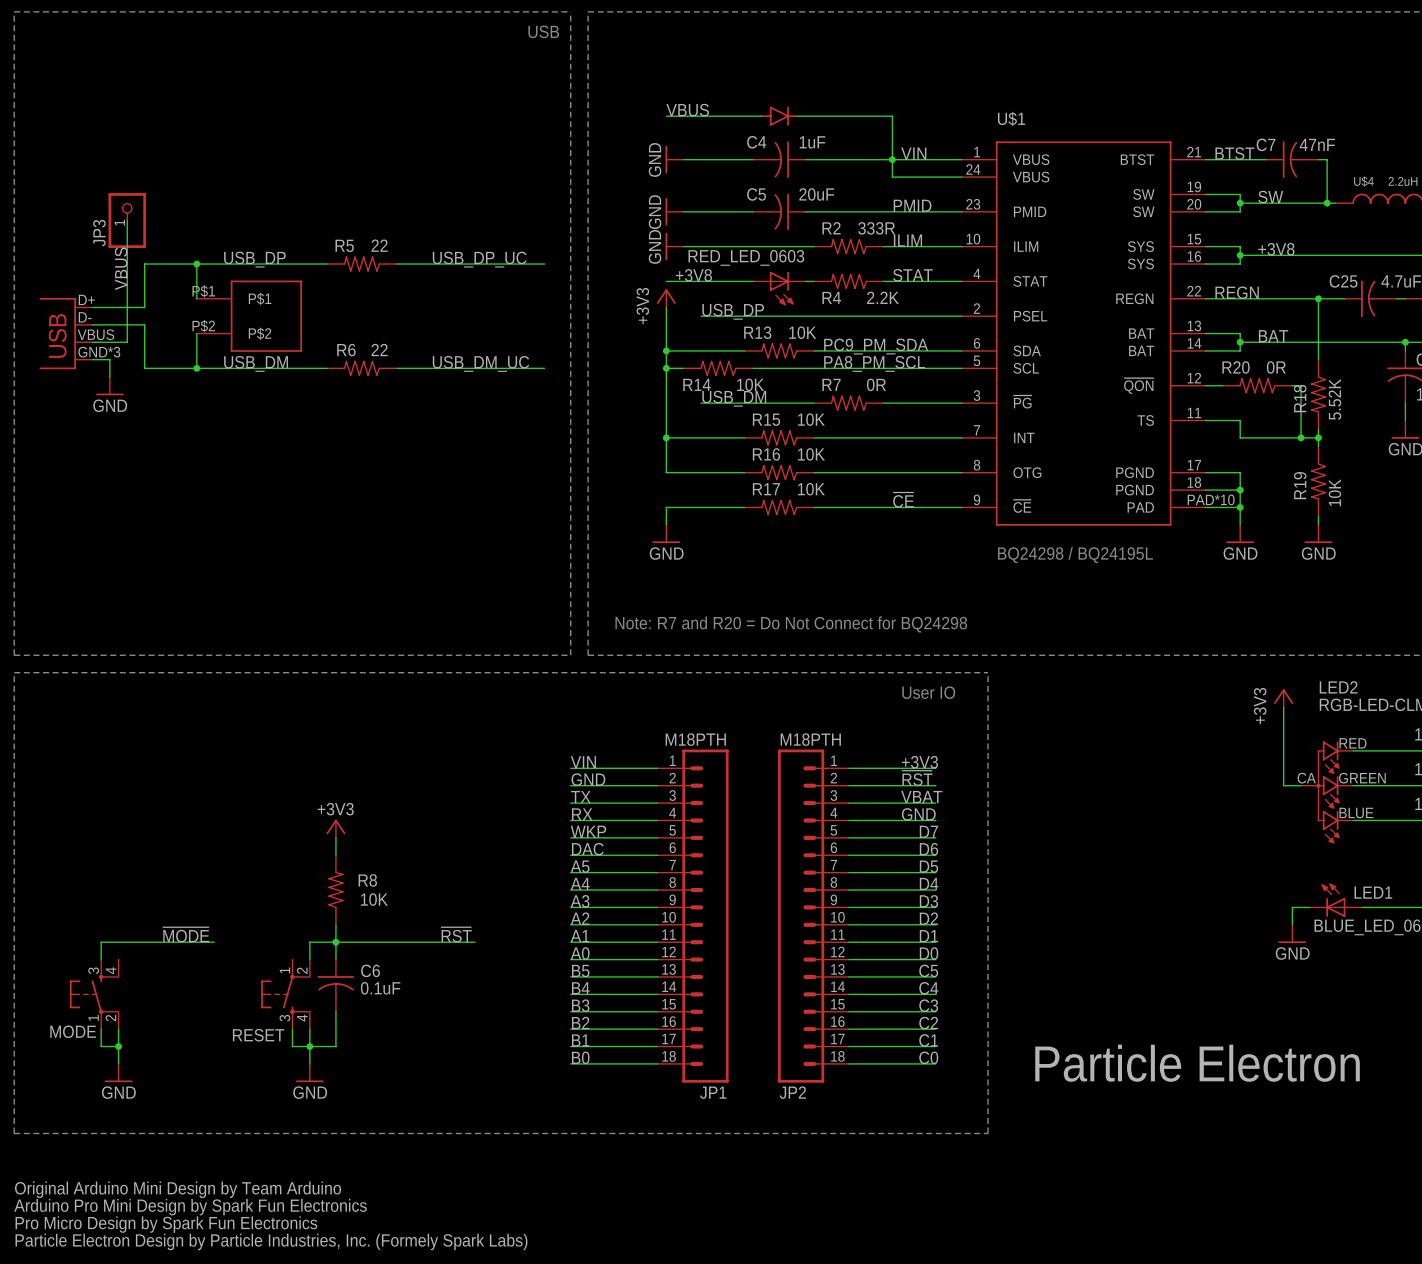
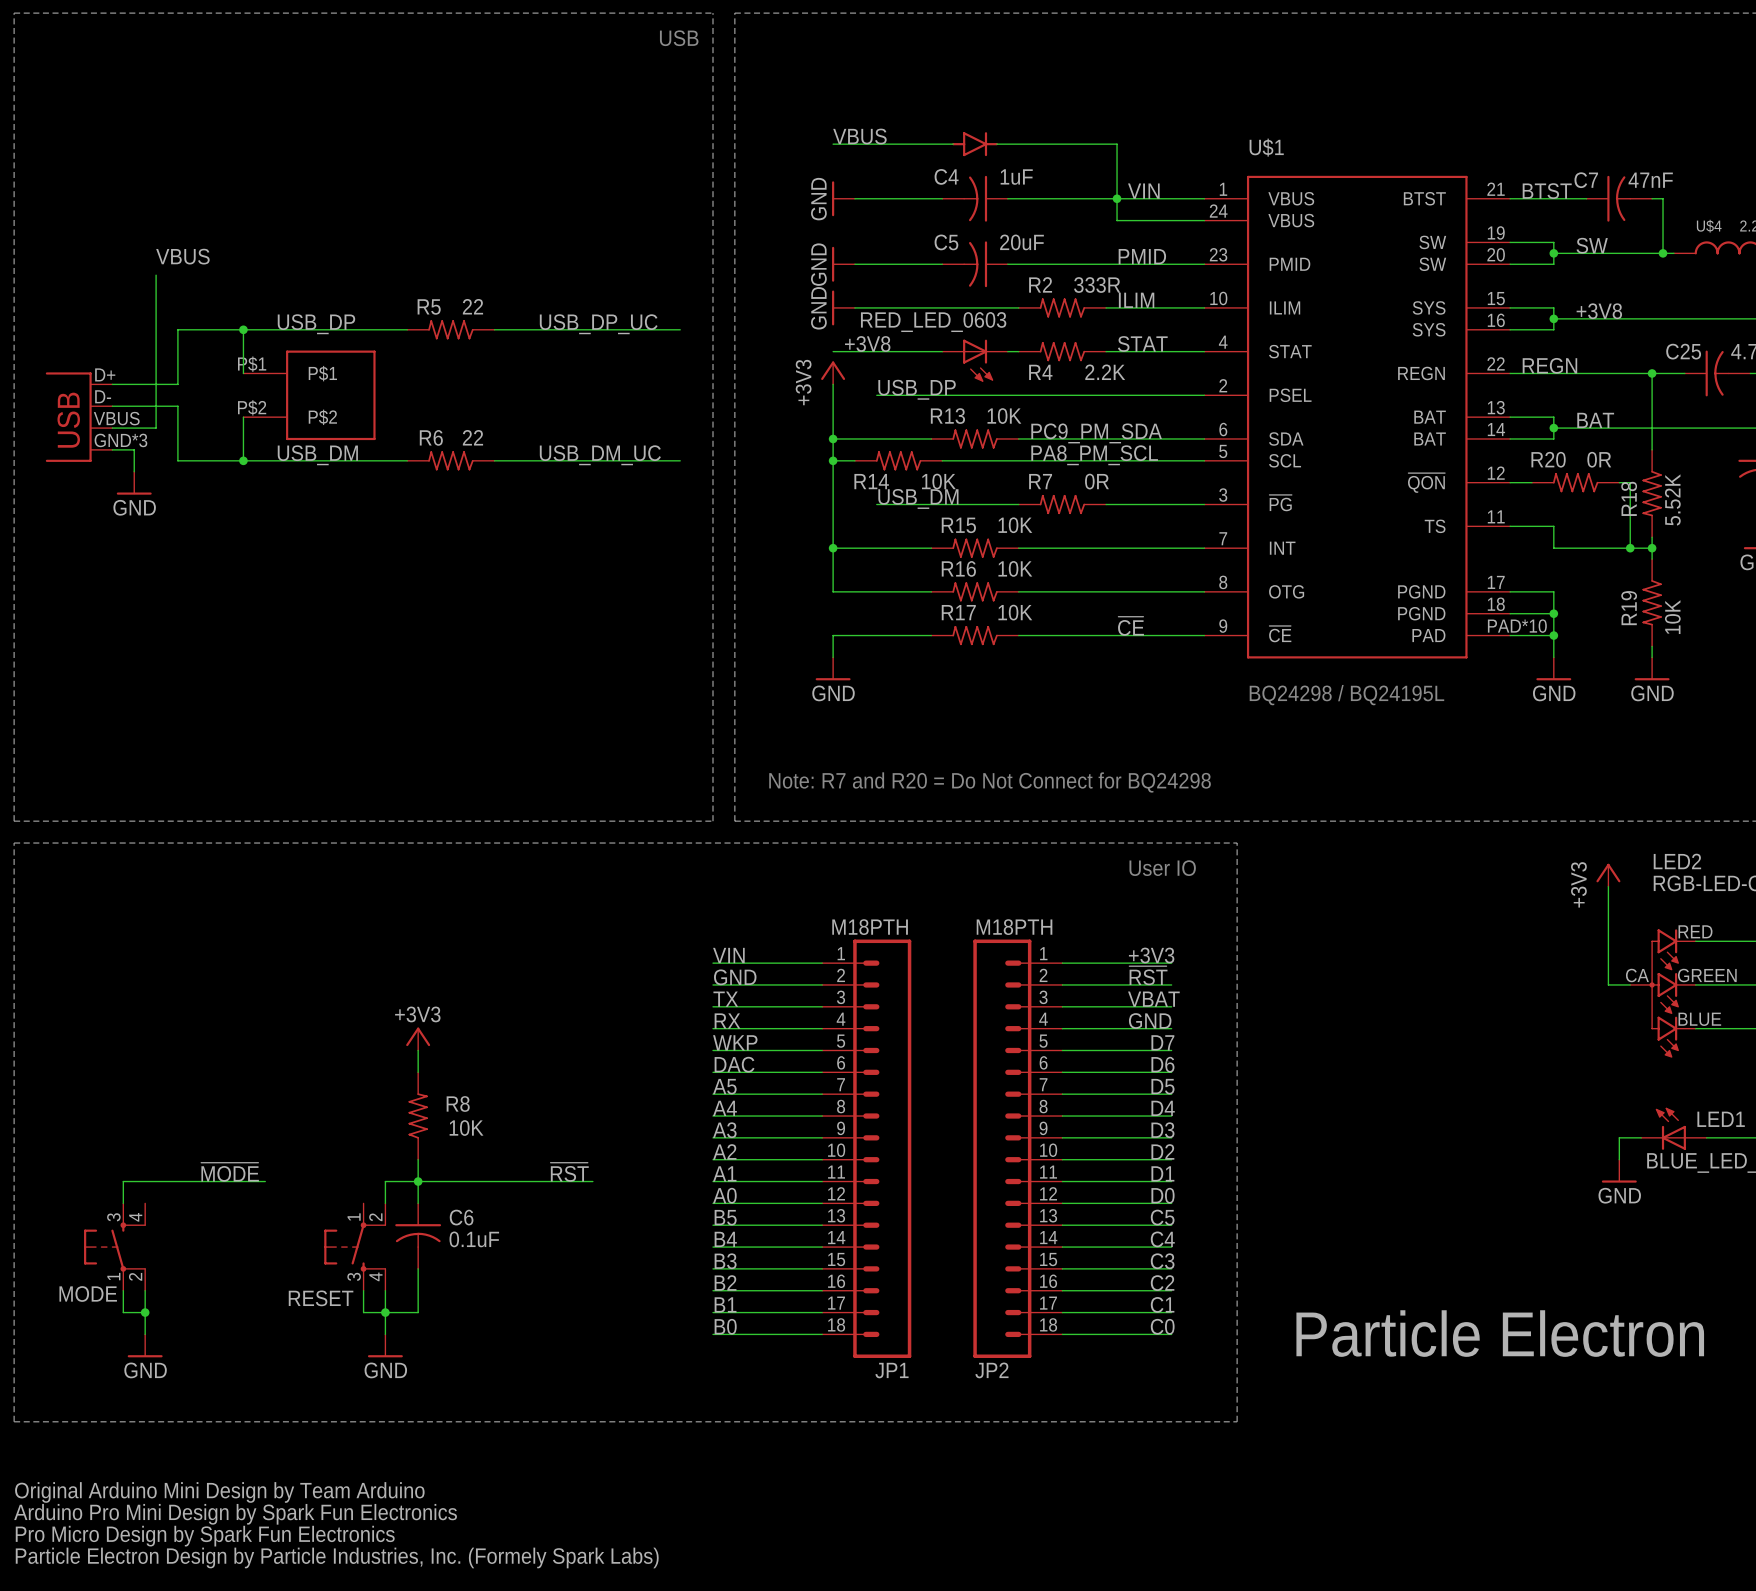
JP3: (127, 220) -> none
label rotation: 0° (121, 268) -> 90° clockwise (182, 256)
label position: VBUS (121, 268) -> VBUS (182, 256)

